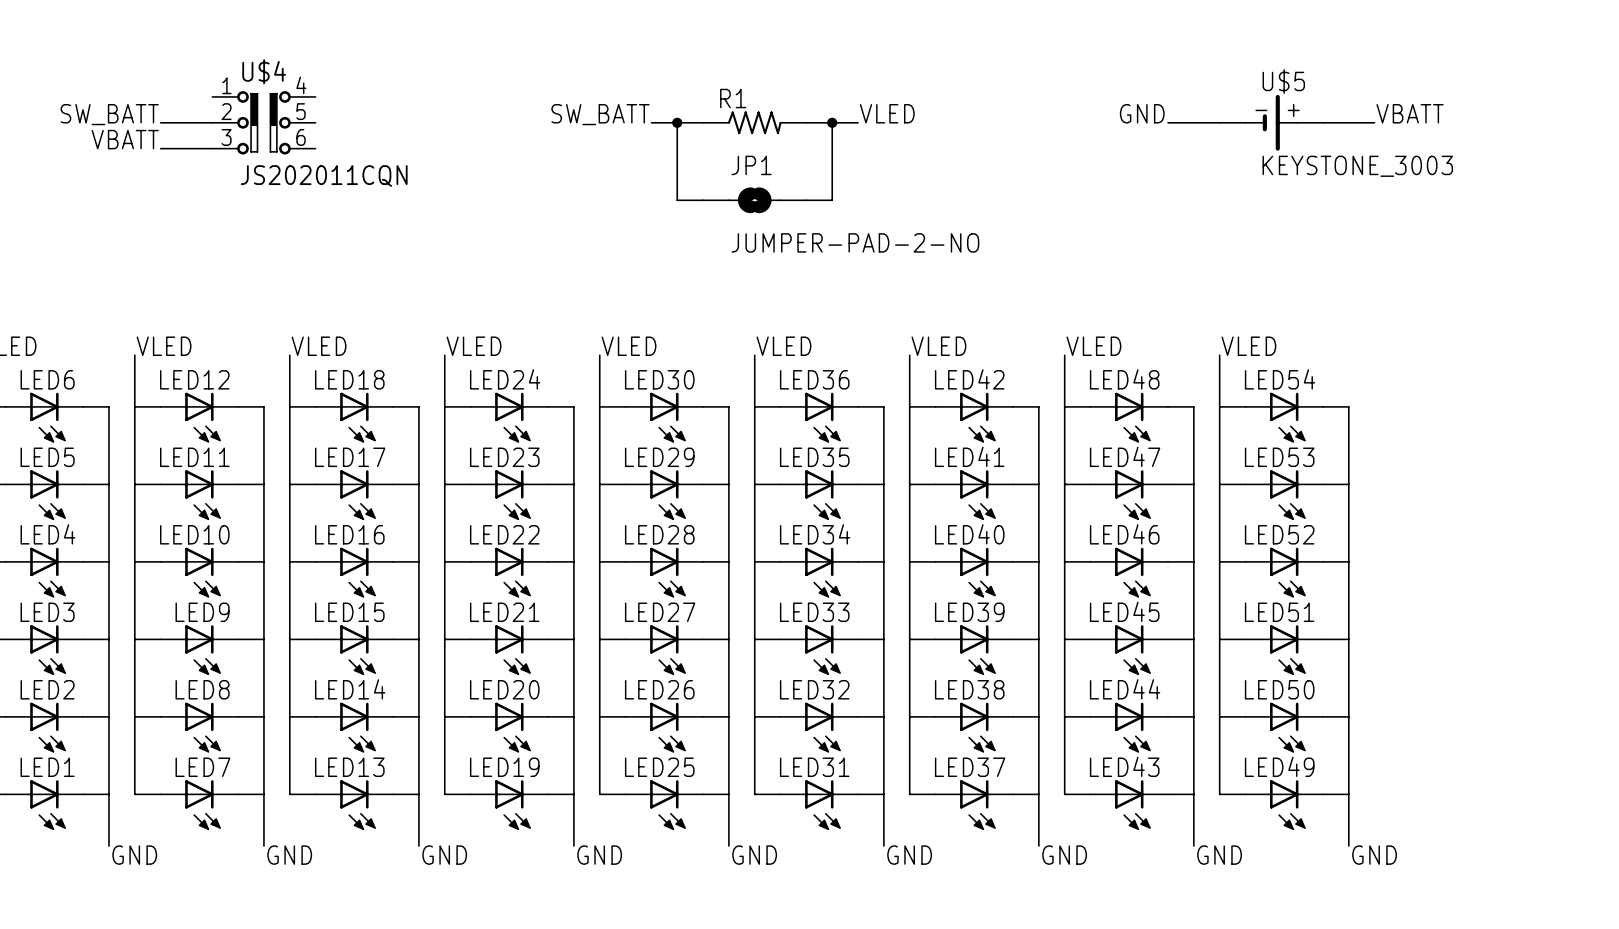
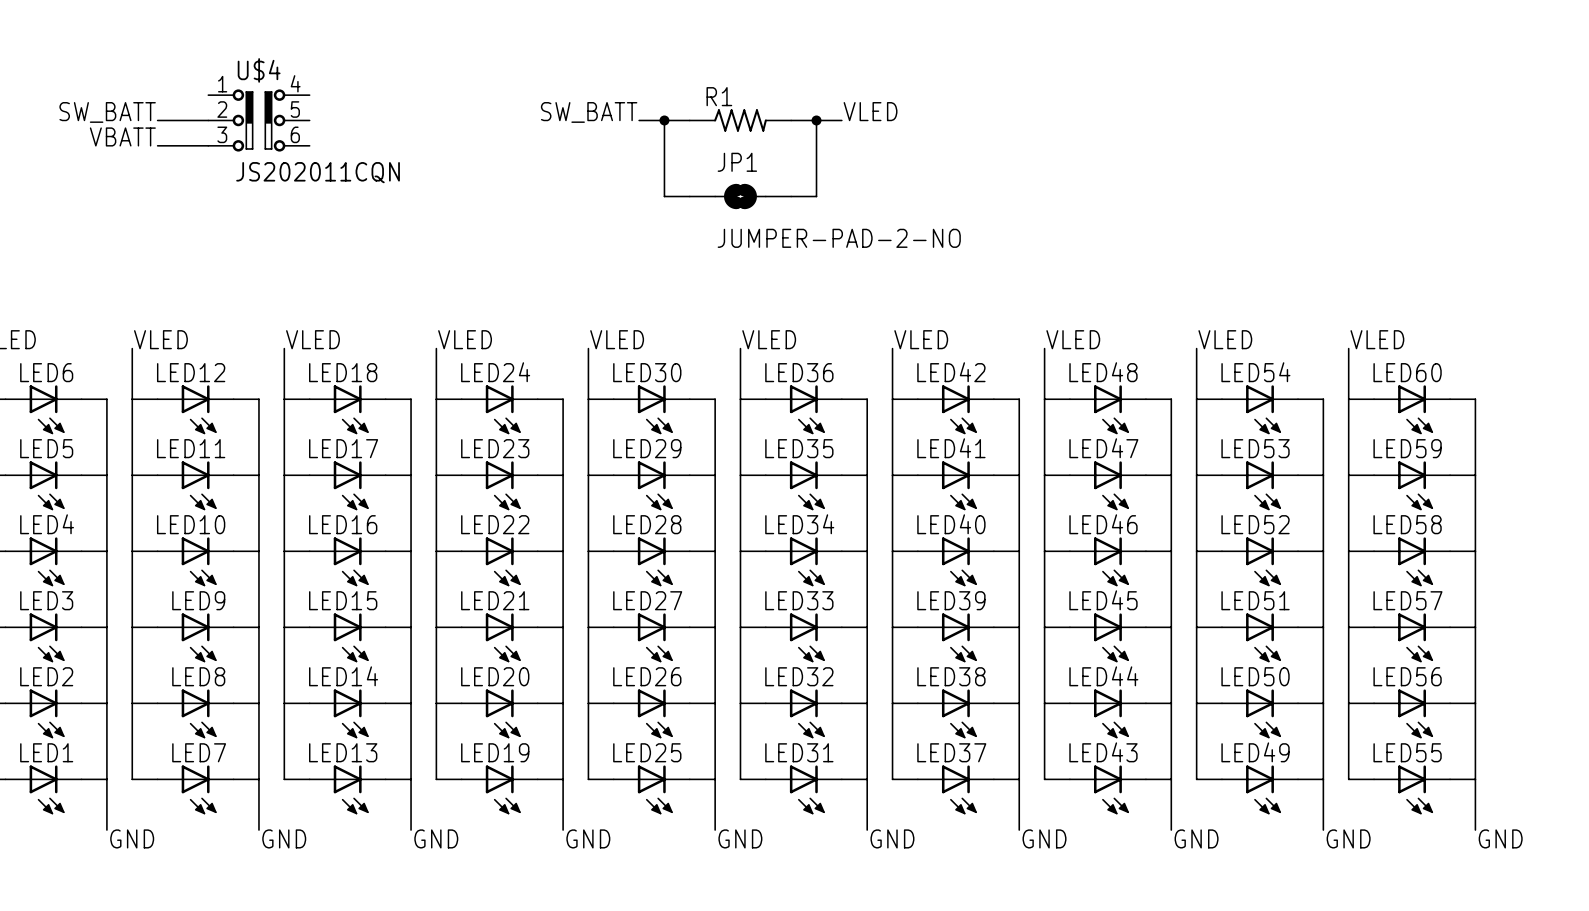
label: GND (1142, 113) -> none
label: VBATT (1410, 113) -> none
wire: (1168, 122) (1219, 122) -> none
U$5: KEYSTONE_3003 (1271, 122) -> none
wire: (1322, 122) (1374, 122) -> none
label: none -> VLED (1377, 339)
wire: none -> (1348, 348) (1348, 779) (1374, 779)
wire: none -> (1348, 399) (1374, 399)
wire: none -> (1450, 399) (1475, 399) (1475, 830)
LED60: none -> (1412, 409)
wire: none -> (1348, 475) (1374, 475)
wire: none -> (1450, 475) (1475, 475)
LED59: none -> (1412, 485)
wire: none -> (1348, 551) (1374, 551)
wire: none -> (1450, 551) (1475, 551)
LED58: none -> (1412, 561)
wire: none -> (1348, 627) (1374, 627)
wire: none -> (1450, 627) (1475, 627)
LED57: none -> (1412, 637)
wire: none -> (1348, 703) (1374, 703)
wire: none -> (1450, 703) (1475, 703)
LED56: none -> (1412, 713)
wire: none -> (1450, 779) (1475, 779)
LED55: none -> (1412, 789)
label: none -> GND (1500, 838)

